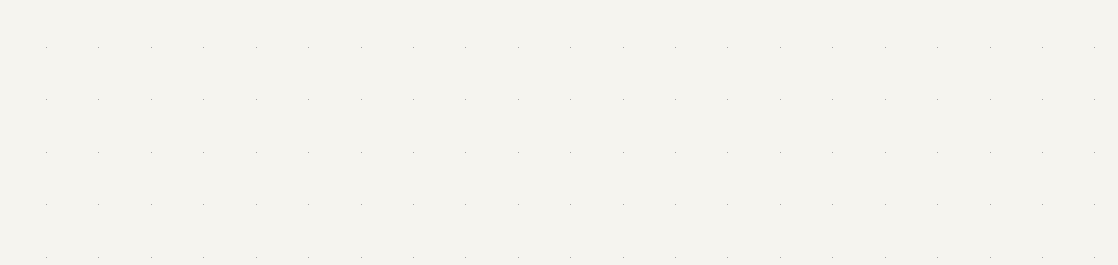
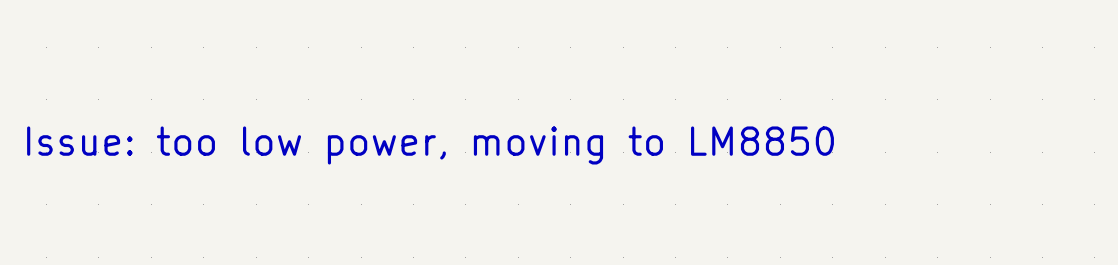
text: none -> Issue: too low power, moving to LM8850 (430, 145)

